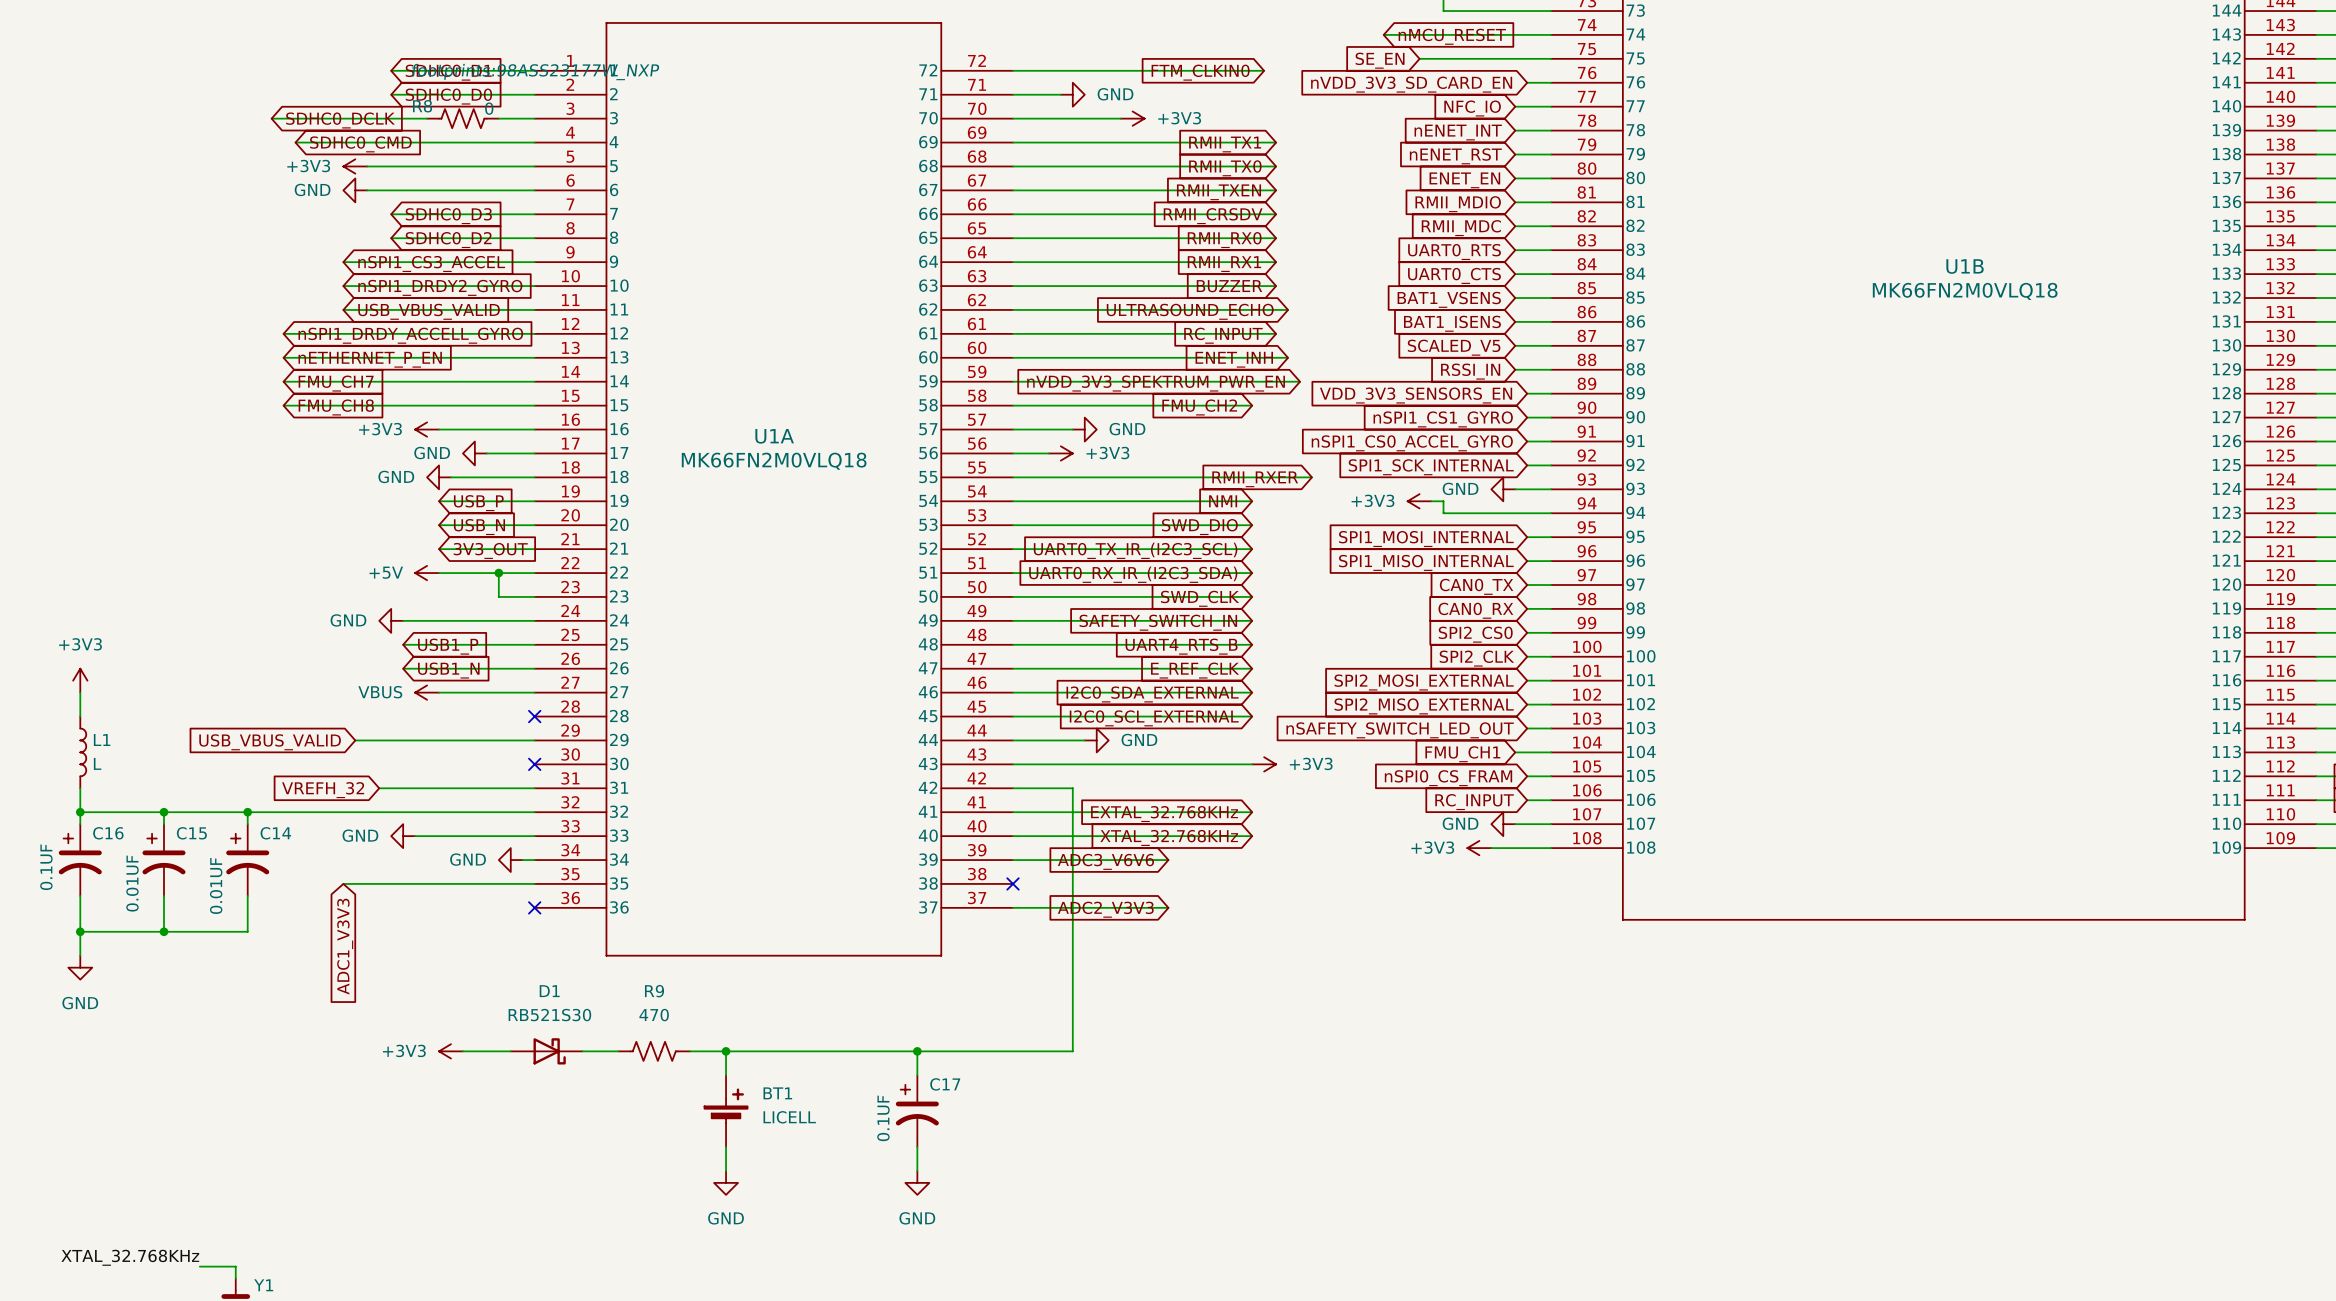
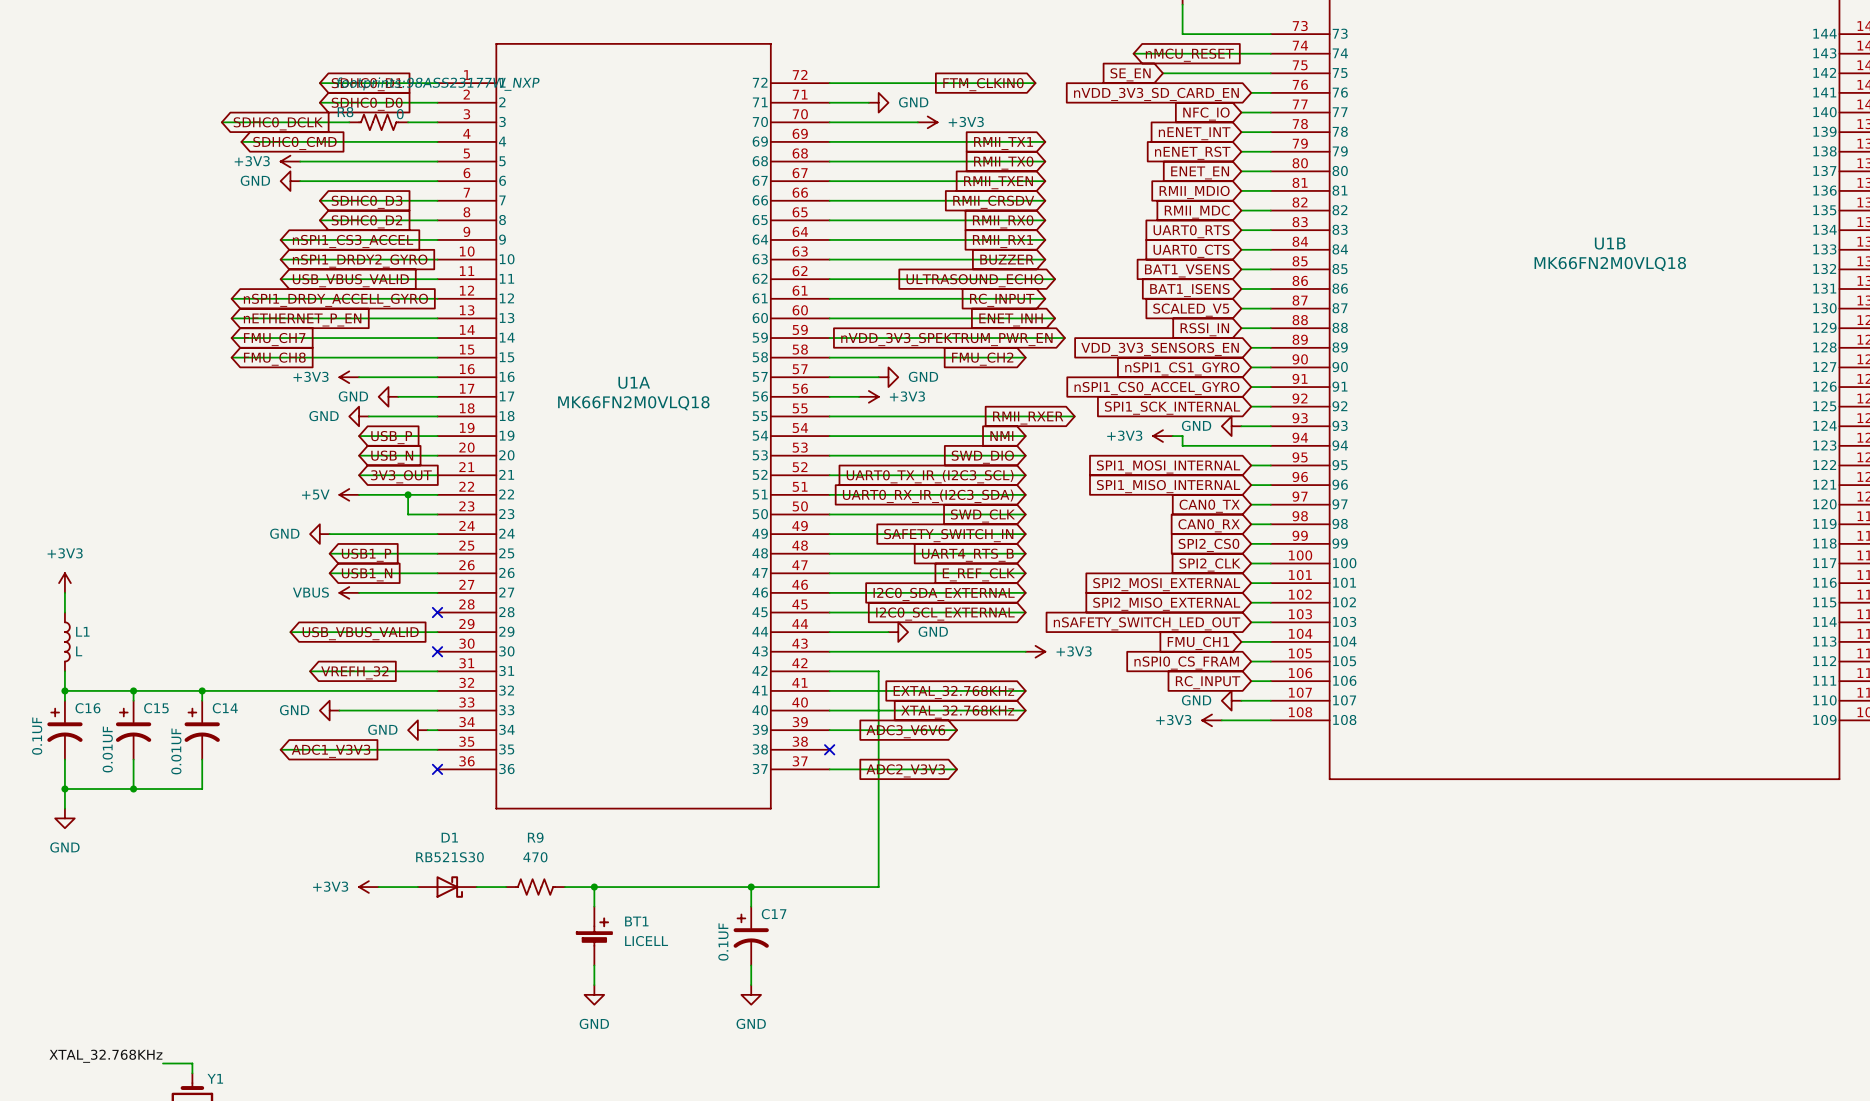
global label rotation: 0° (270, 742) -> 180° (360, 633)
global label rotation: 0° (323, 790) -> 180° (354, 672)
global label rotation: 0° (345, 946) -> 90° counterclockwise (331, 751)

